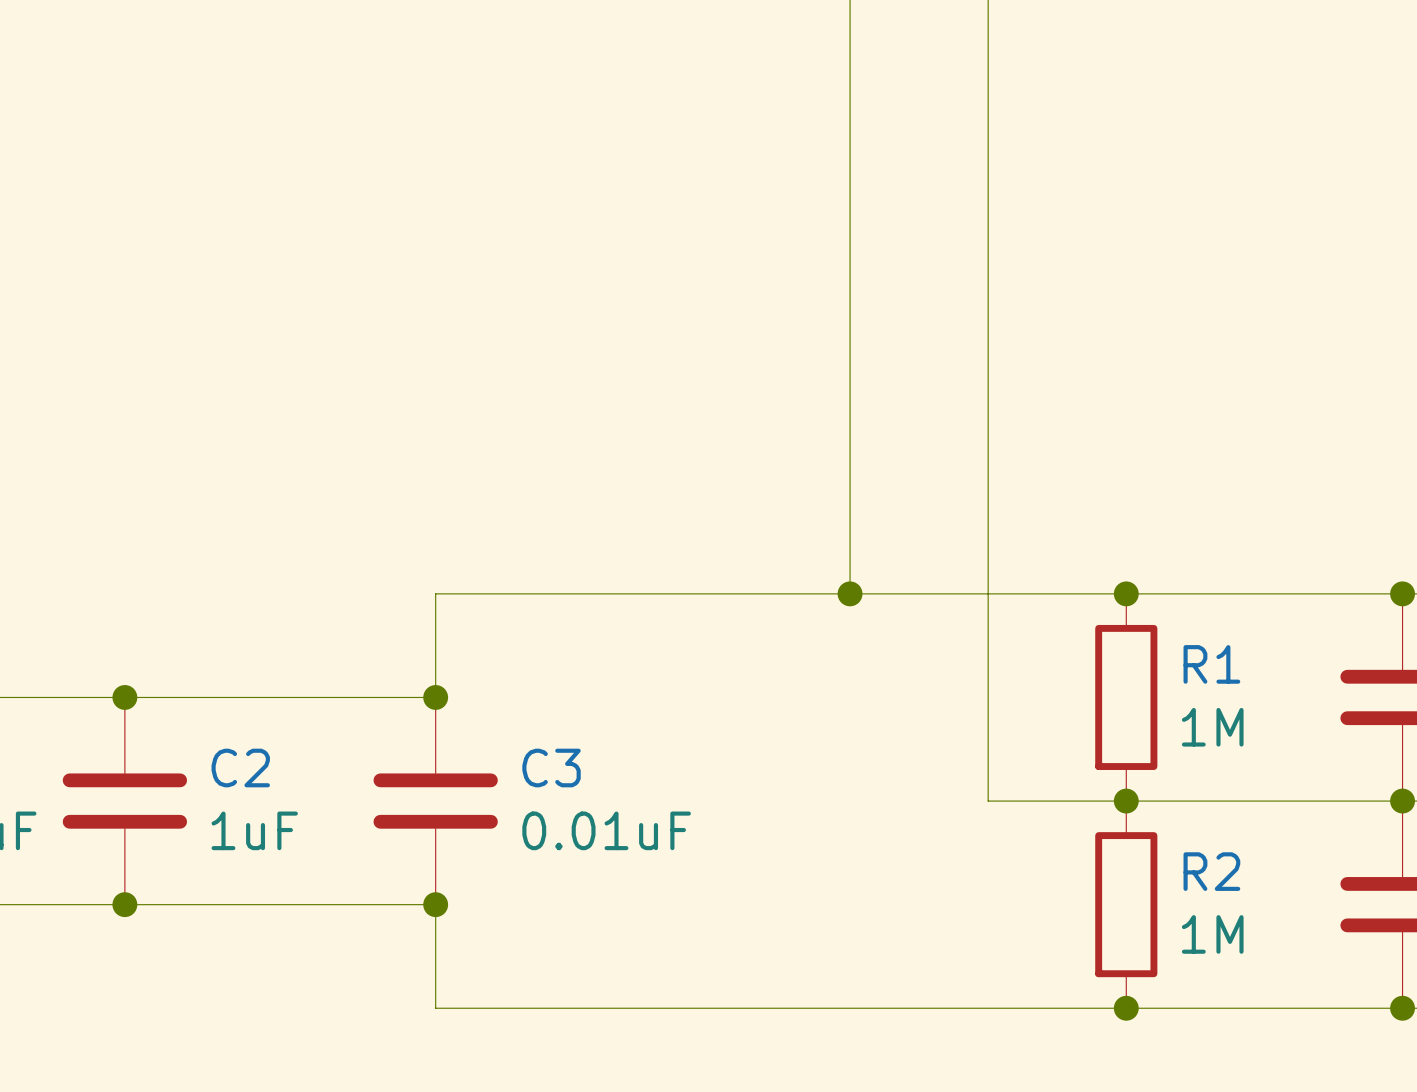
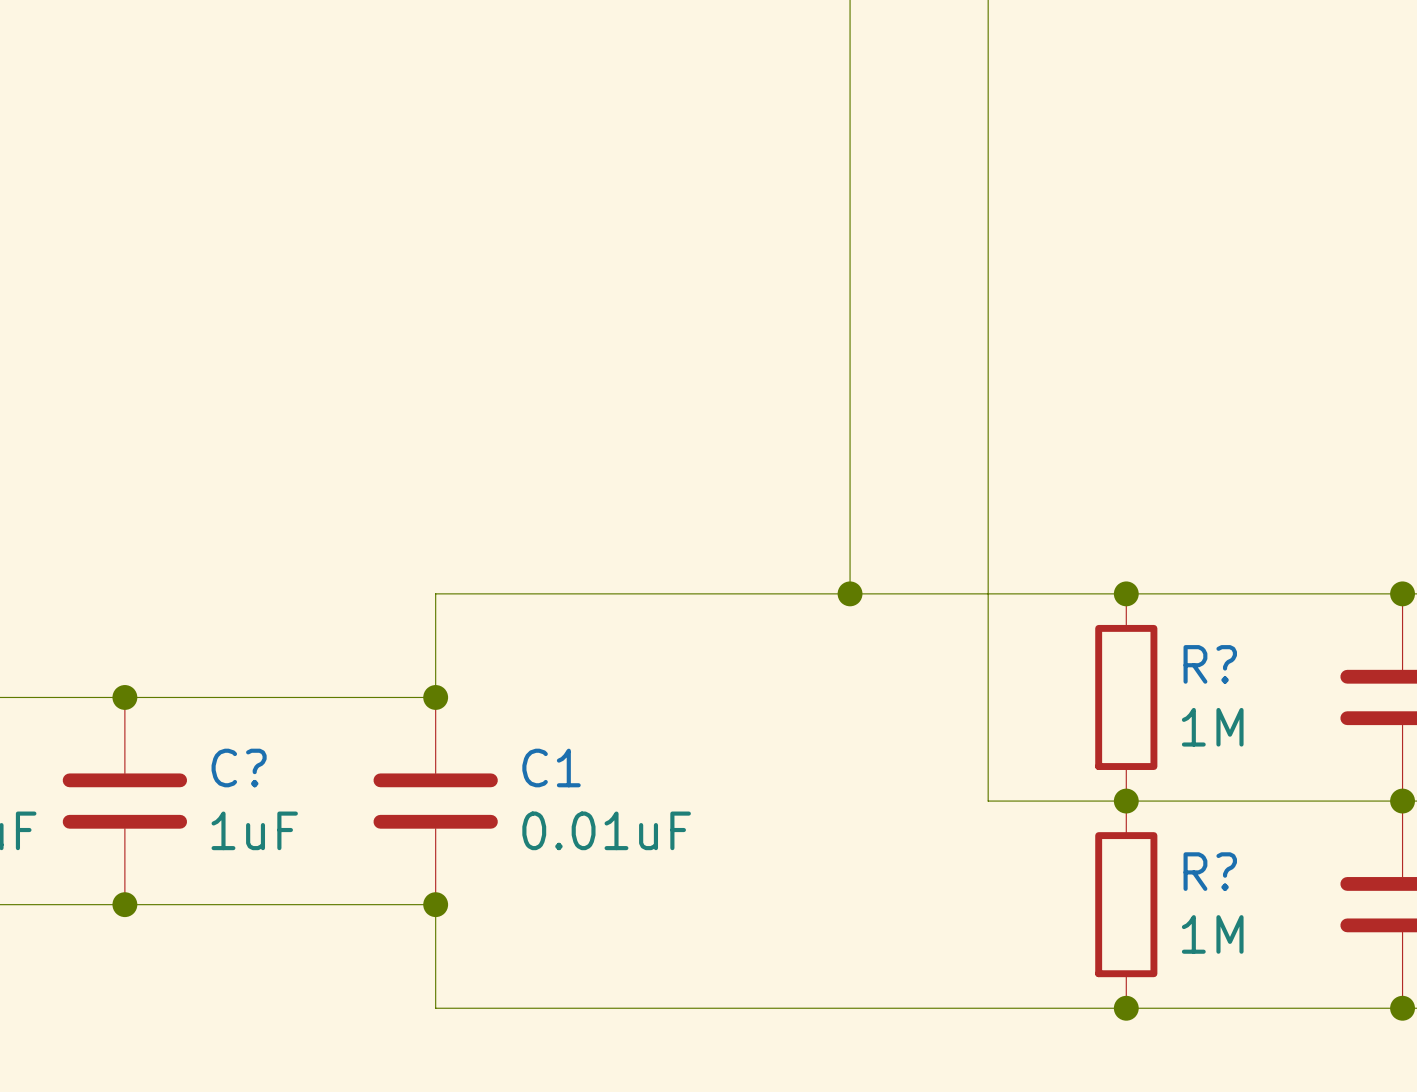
R1 name: R1 (1211, 664) -> R? (1210, 664)
C2 name: C2 (240, 768) -> C? (239, 768)
C3 name: C3 (551, 768) -> C1 (551, 768)
R2 name: R2 (1211, 871) -> R? (1210, 871)

